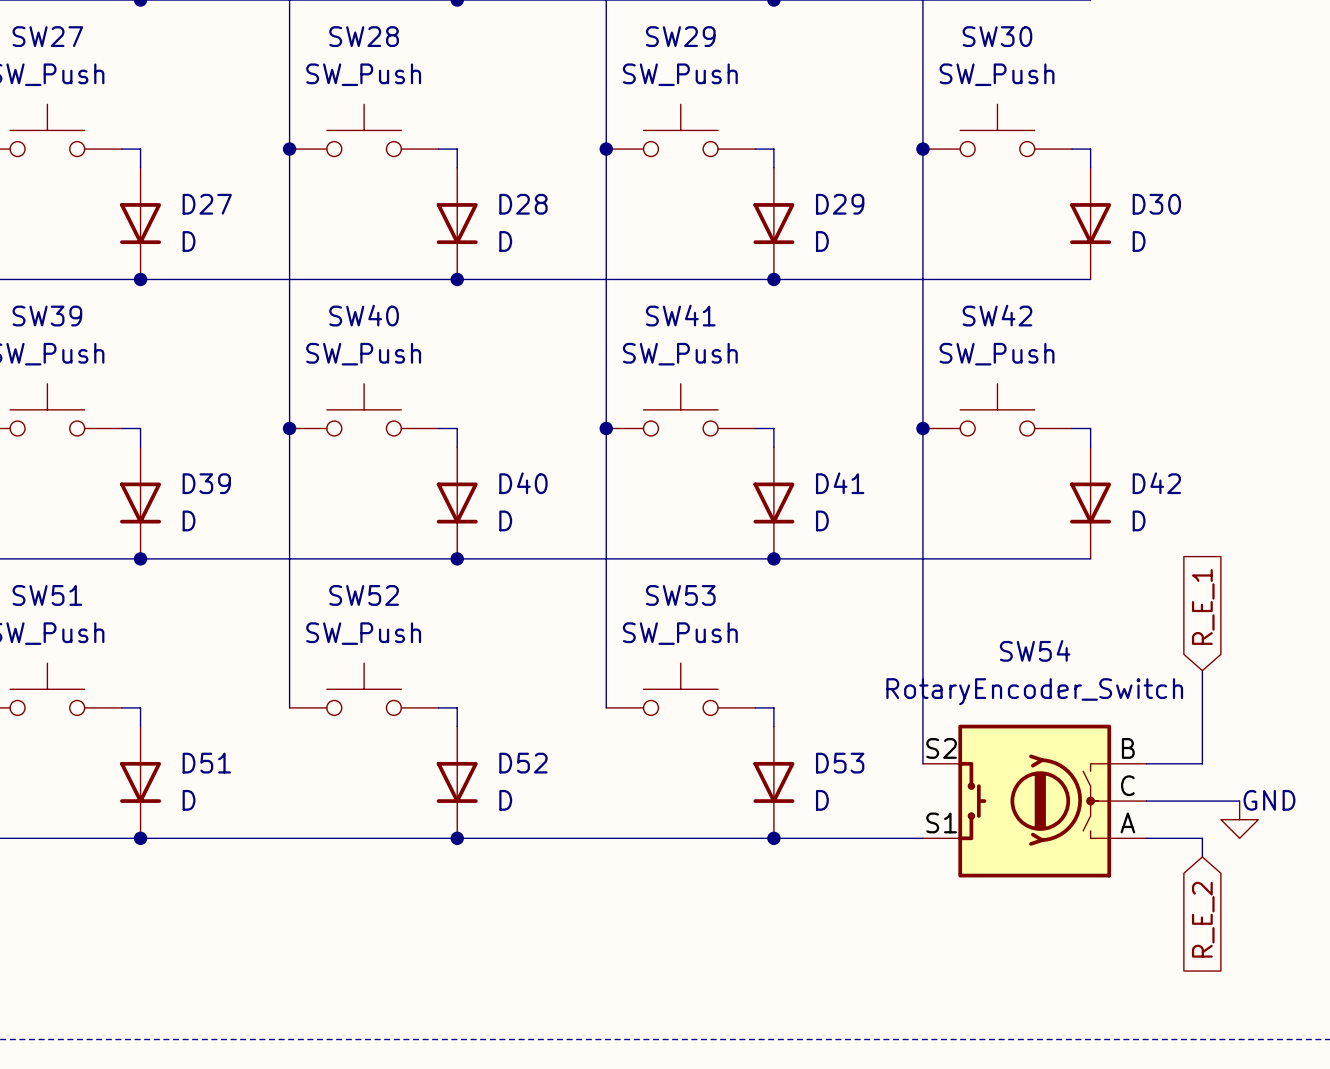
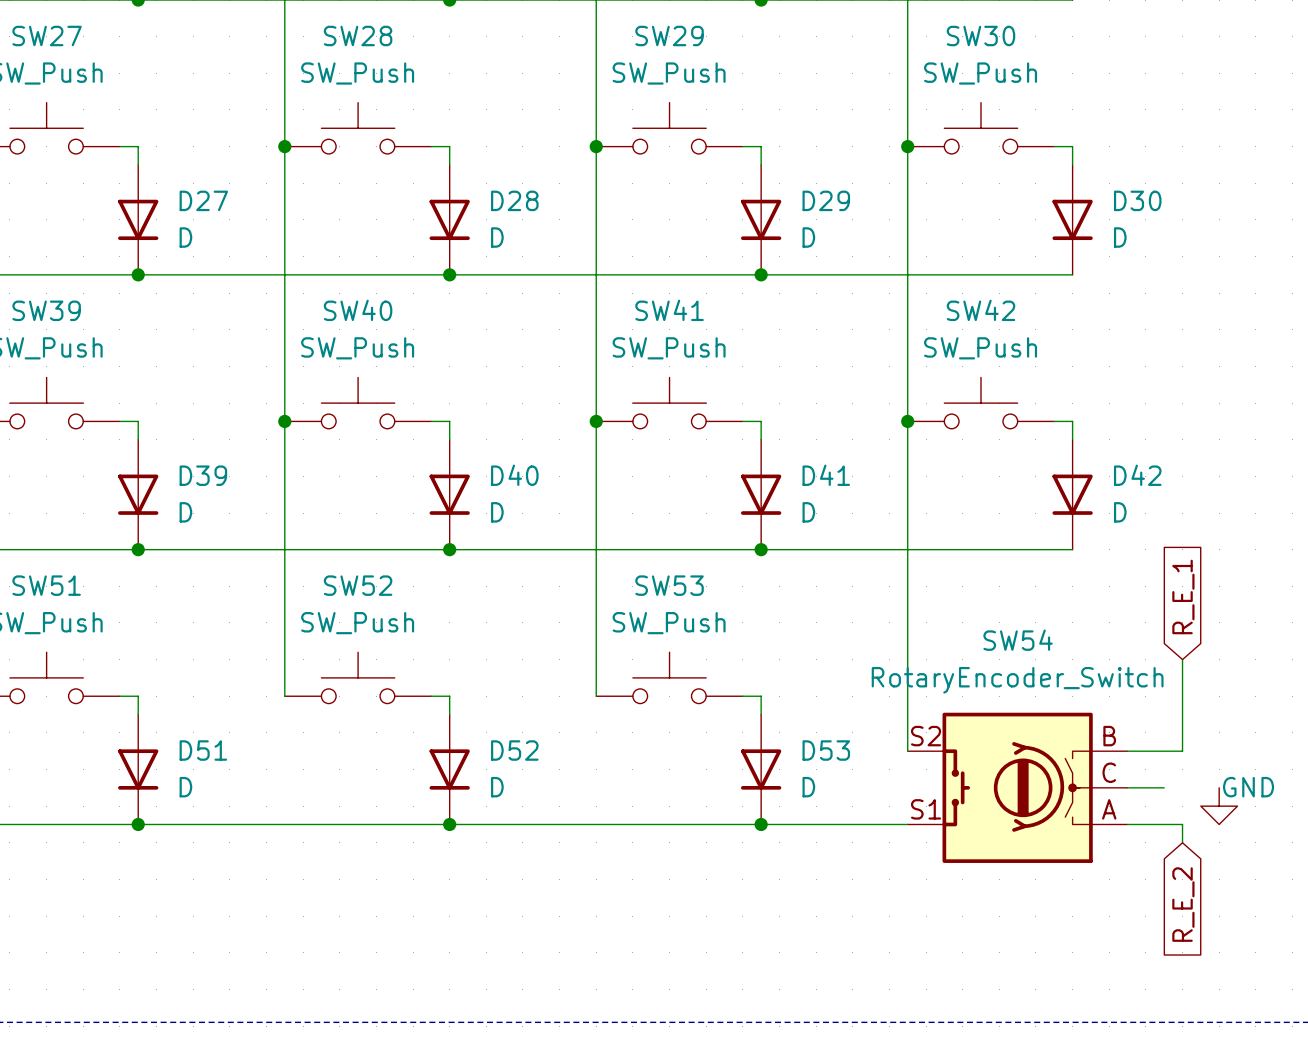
wire: (1183, 801) (1239, 801) -> none

